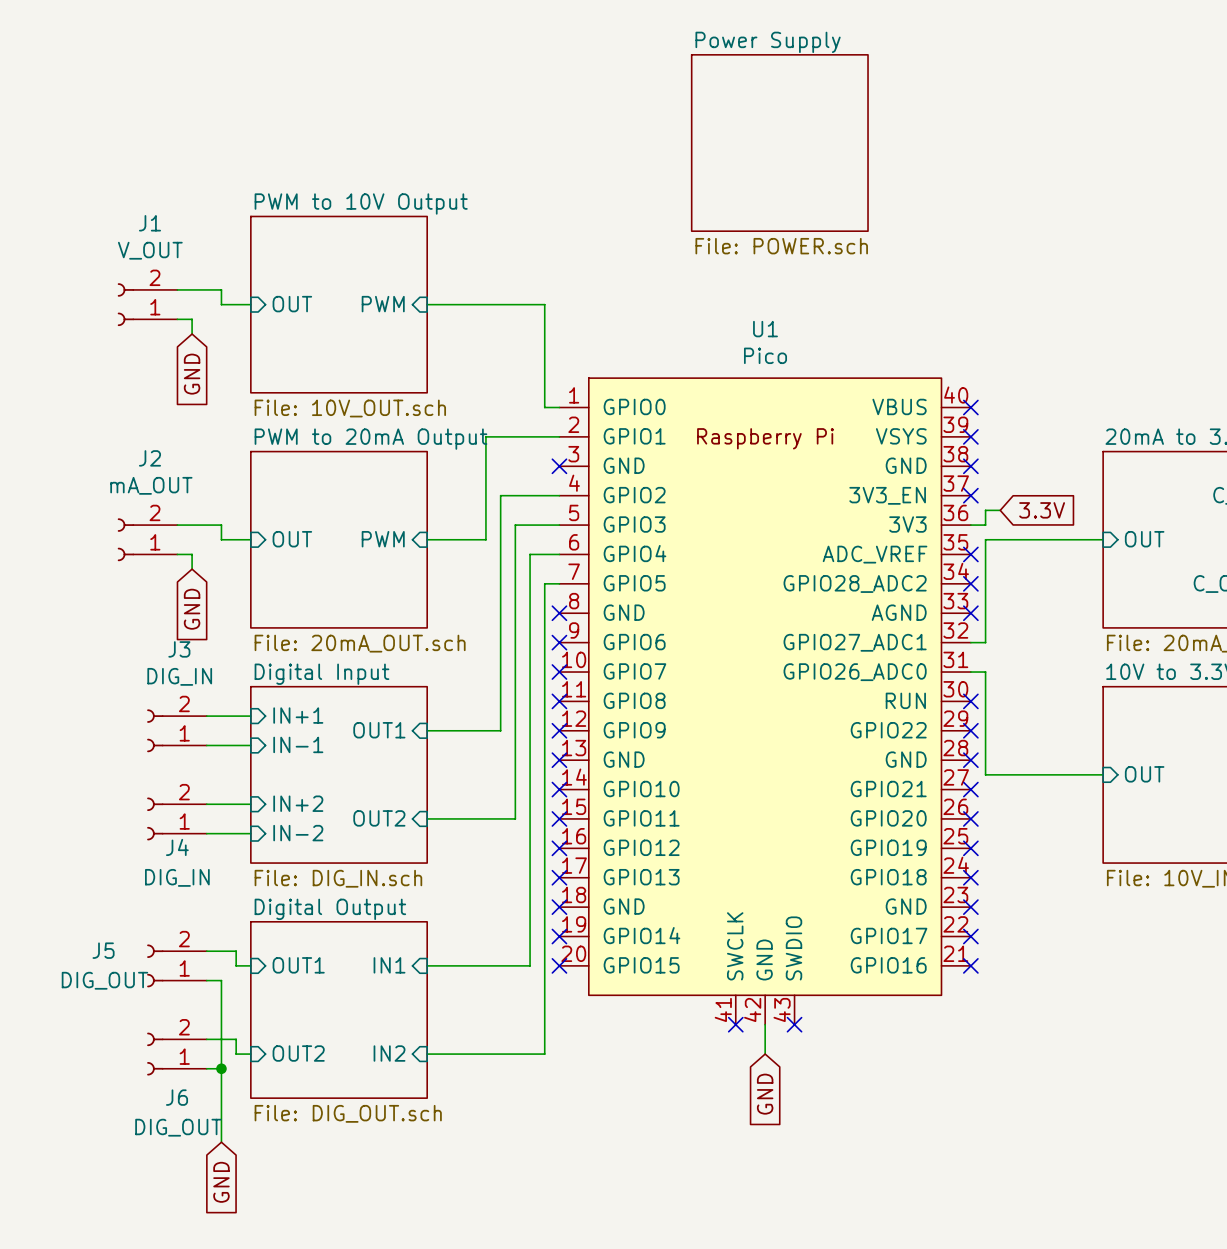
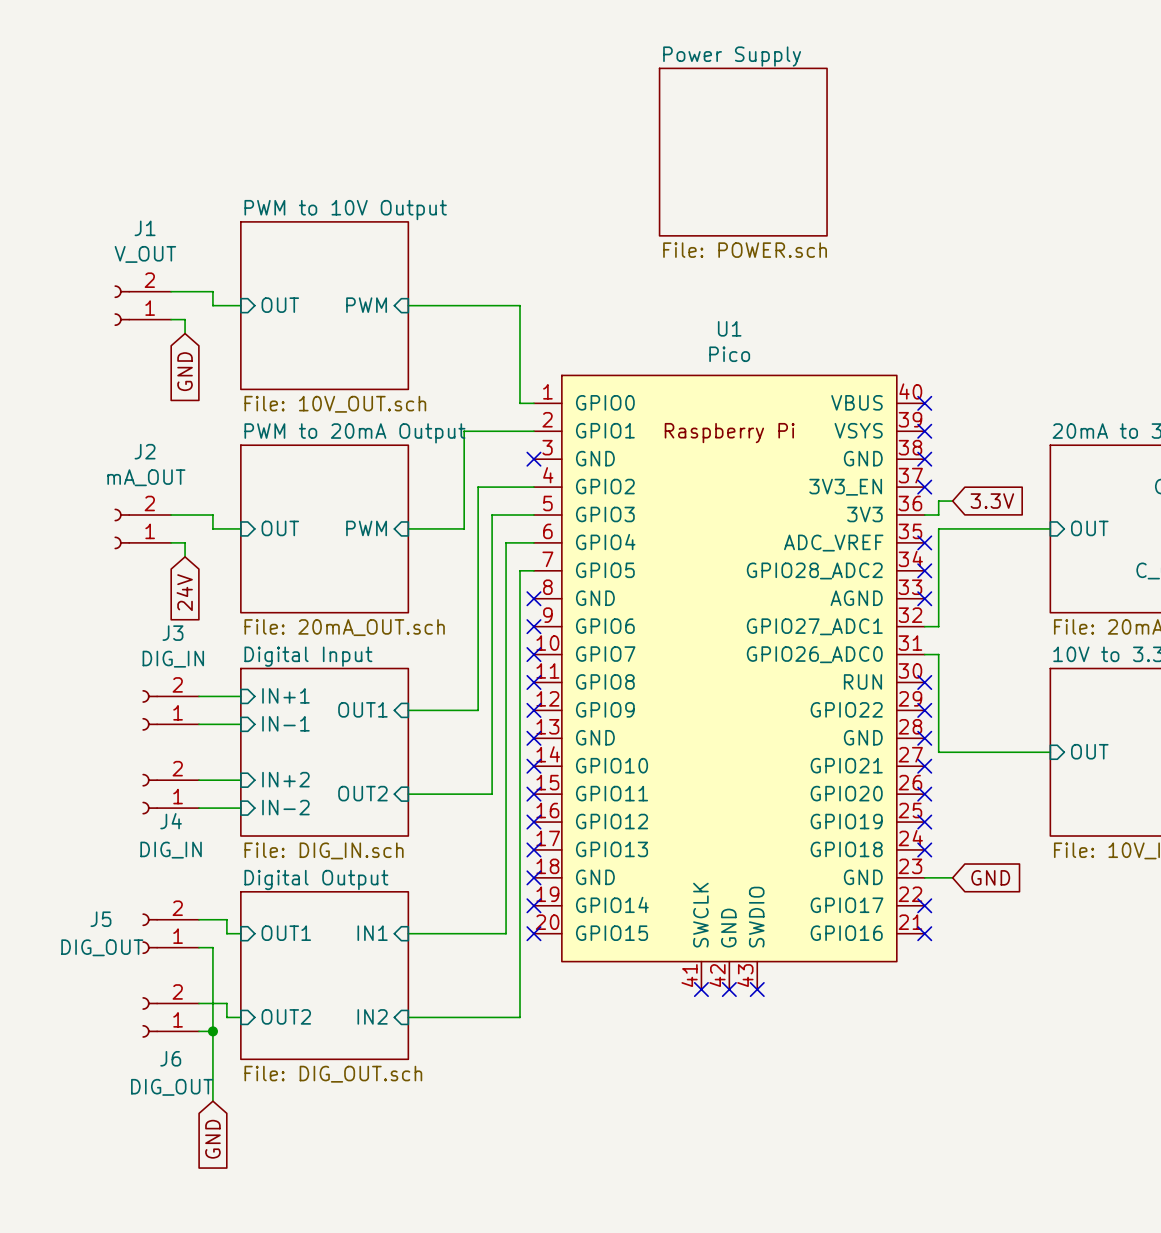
global label: GND (192, 609) -> 24V (184, 592)
wire: none -> (924, 877) (952, 877)
no-connect mark: (970, 907) -> none
wire: (765, 1024) (765, 1054) -> none
no-connect mark: none -> (729, 989)
global label rotation: 0° (765, 1094) -> 90° counterclockwise (990, 877)
global label position: GND (765, 1094) -> GND (990, 877)

